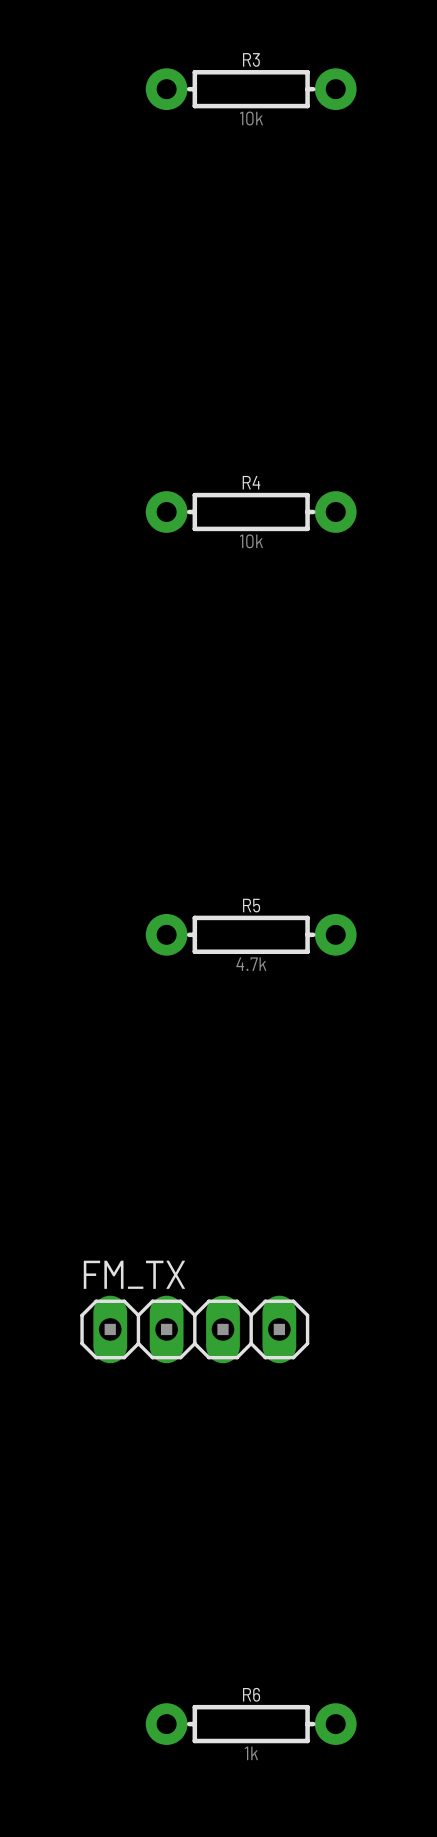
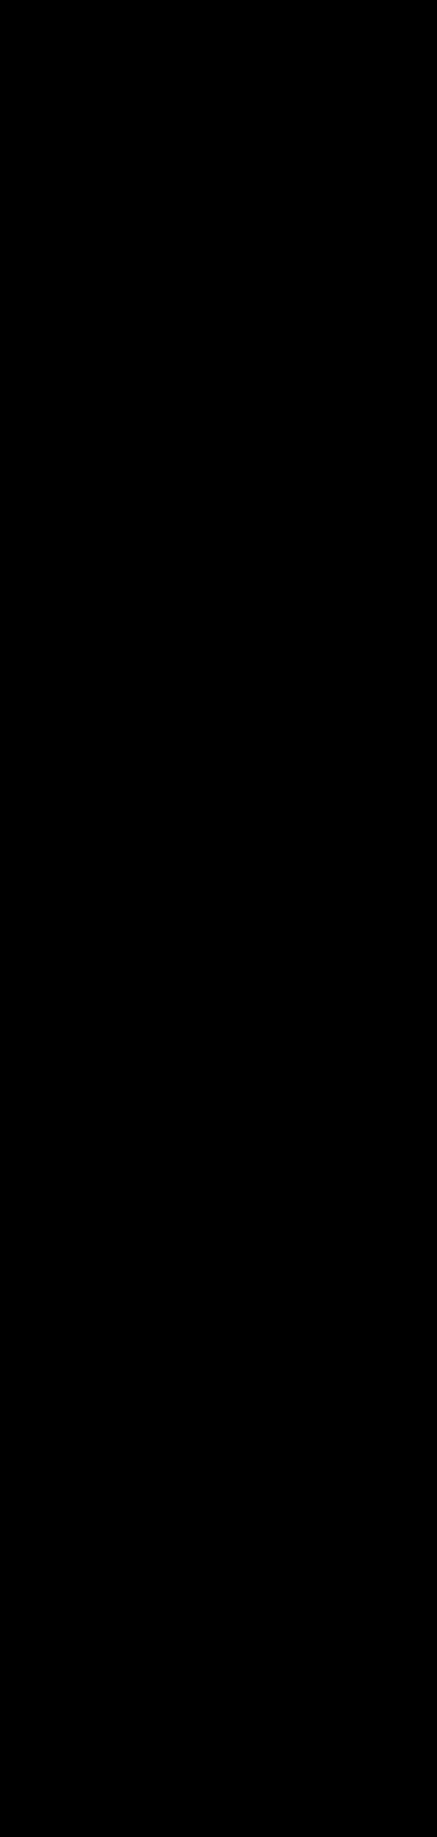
R3: 10k (251, 89) -> none
R4: 10k (251, 512) -> none
R5: 4.7k (251, 934) -> none
FM_TX: (194, 1329) -> none
R6: 1k (251, 1724) -> none

